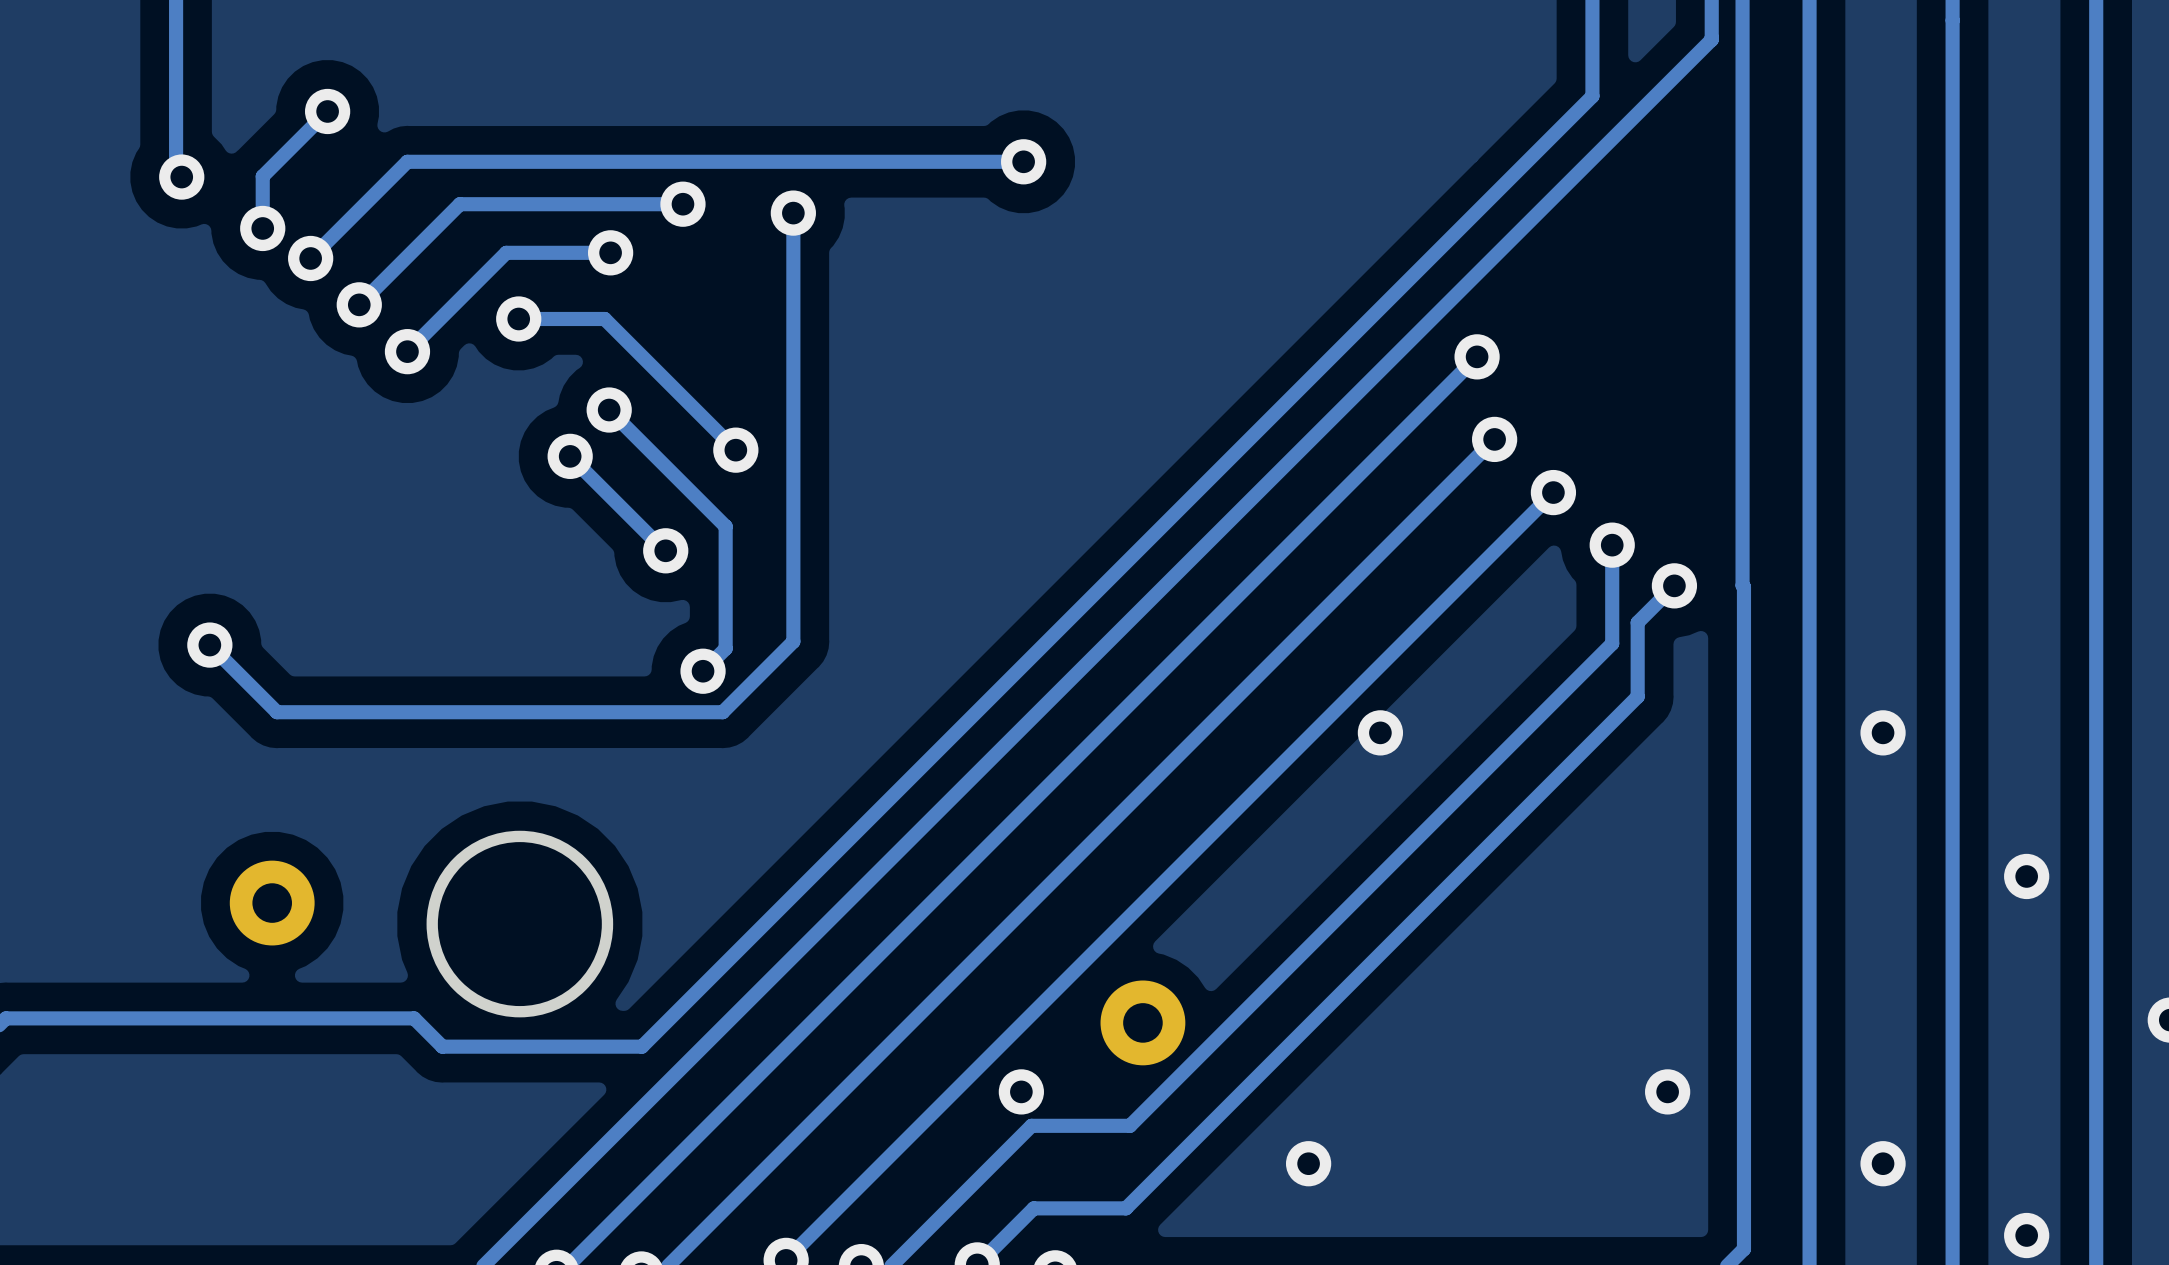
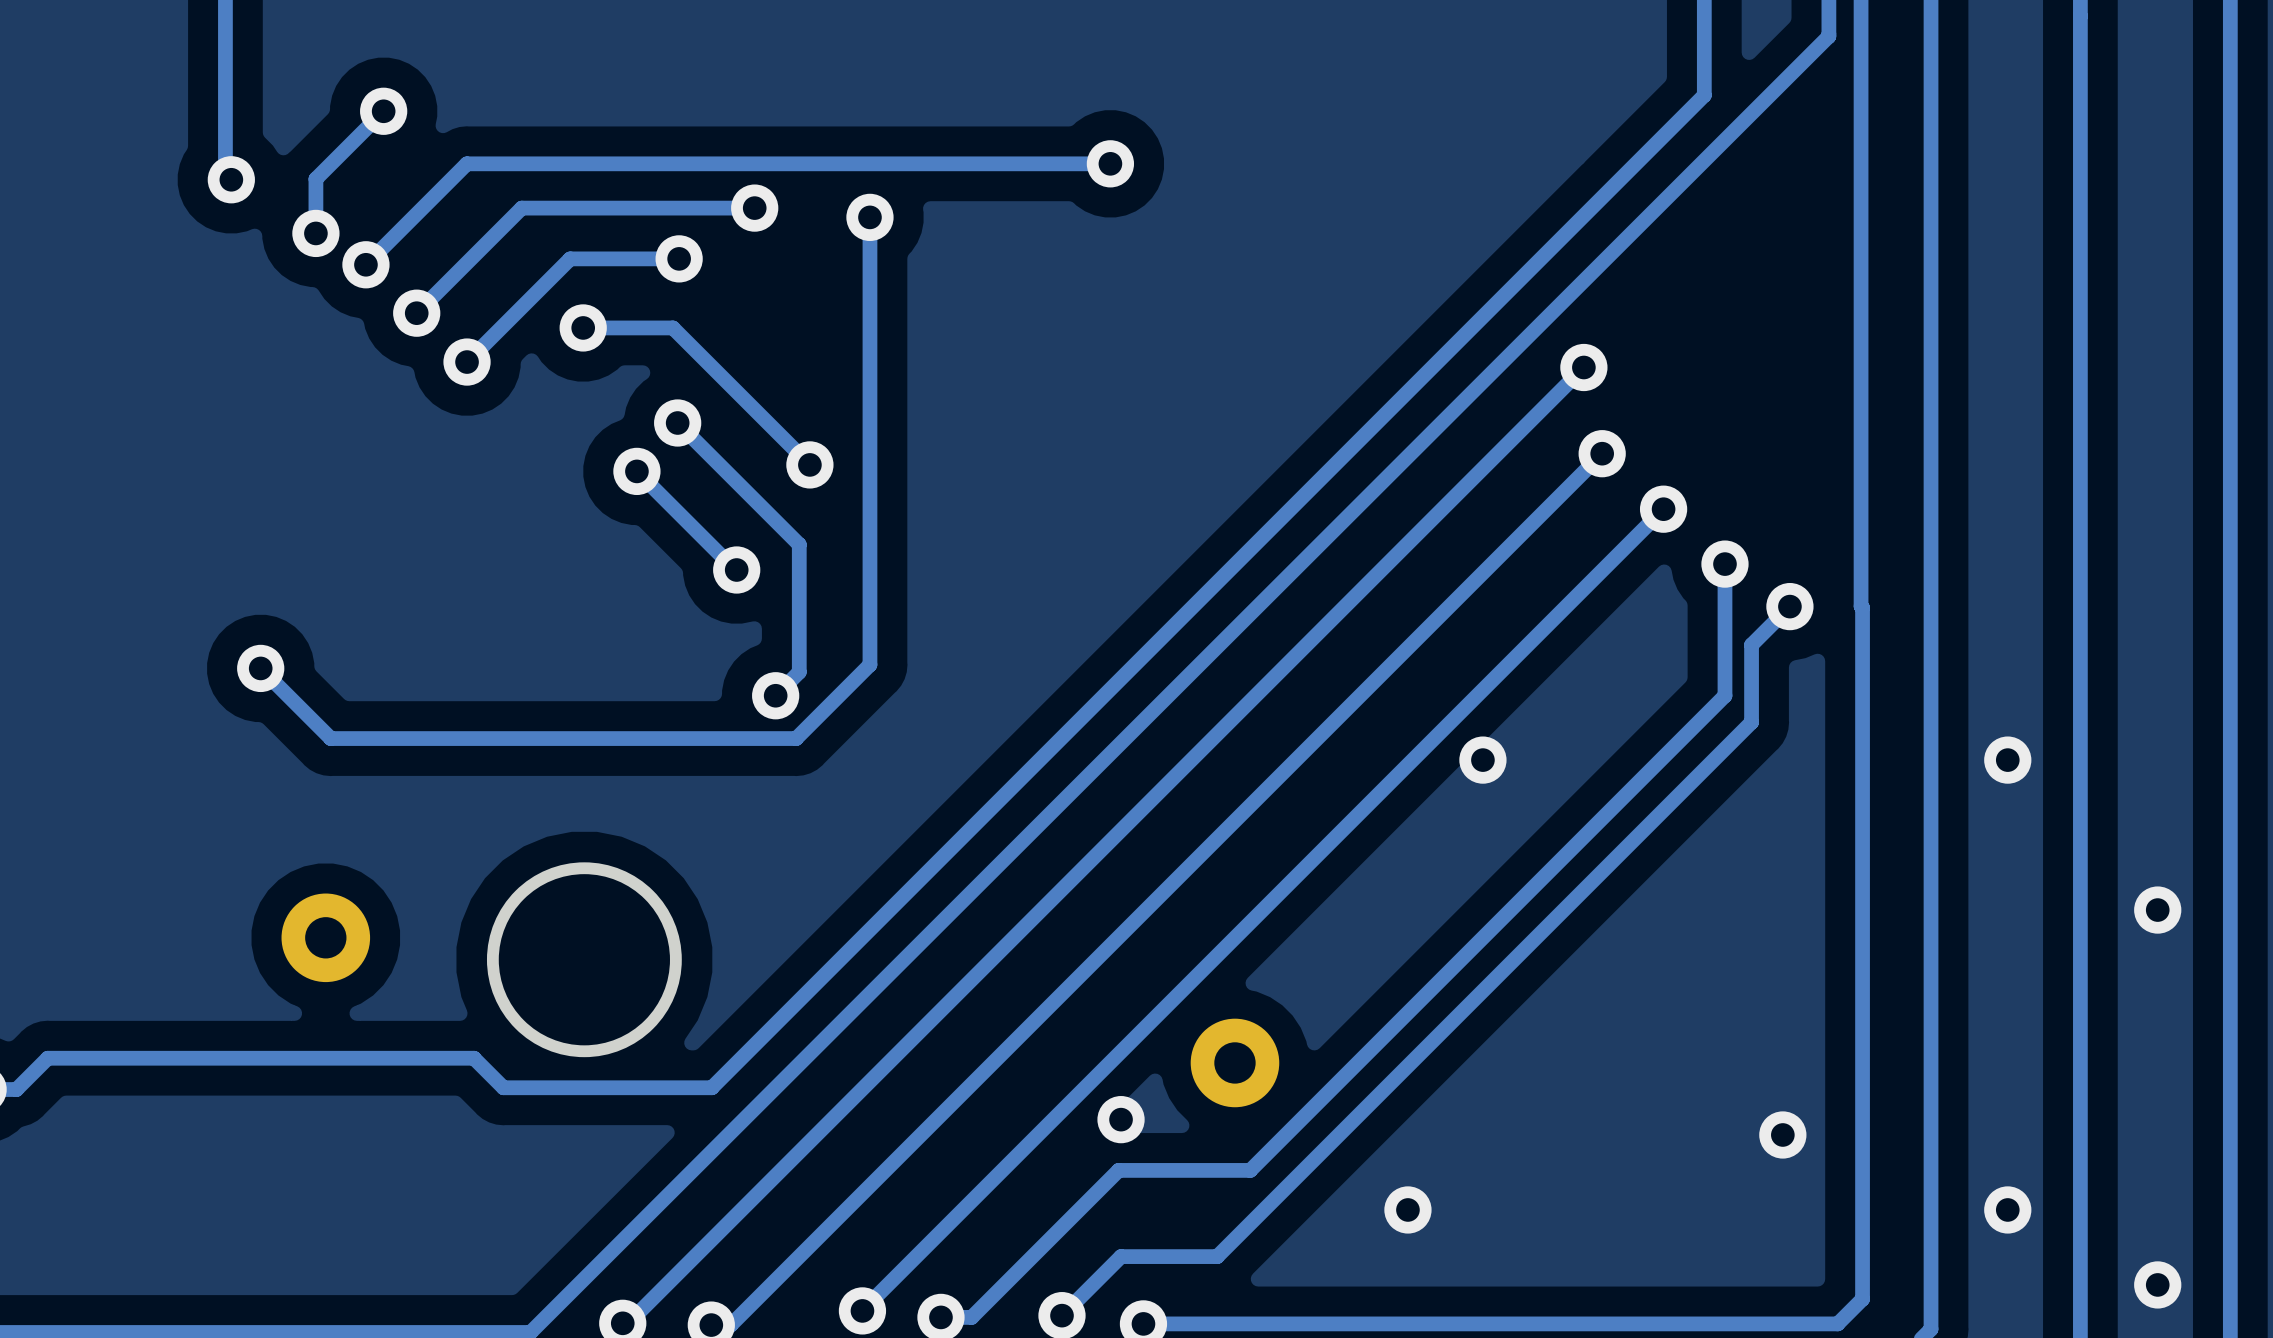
track: (1612, 643) (1129, 1125) -> (1724, 666) (1724, 695) (1250, 1170) (1221, 1170)
via position: (1021, 1091) -> (1121, 1119)

